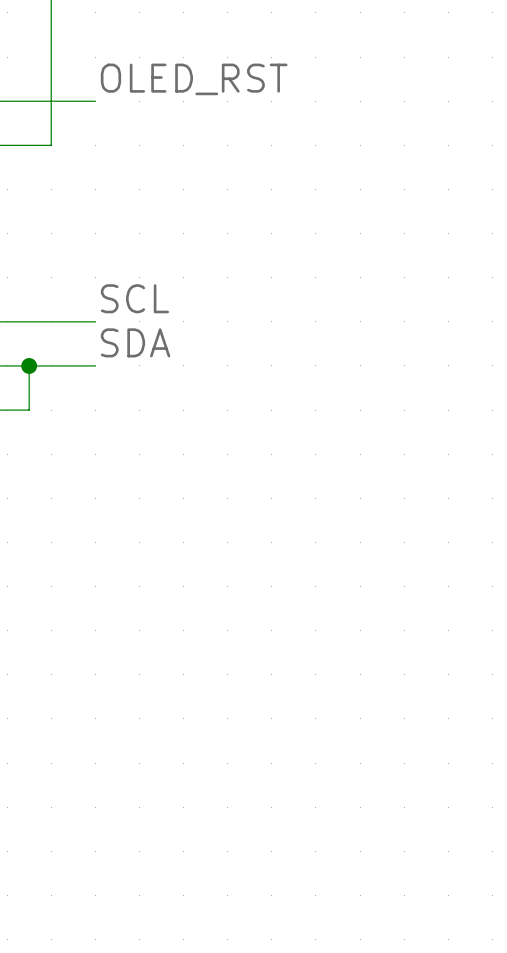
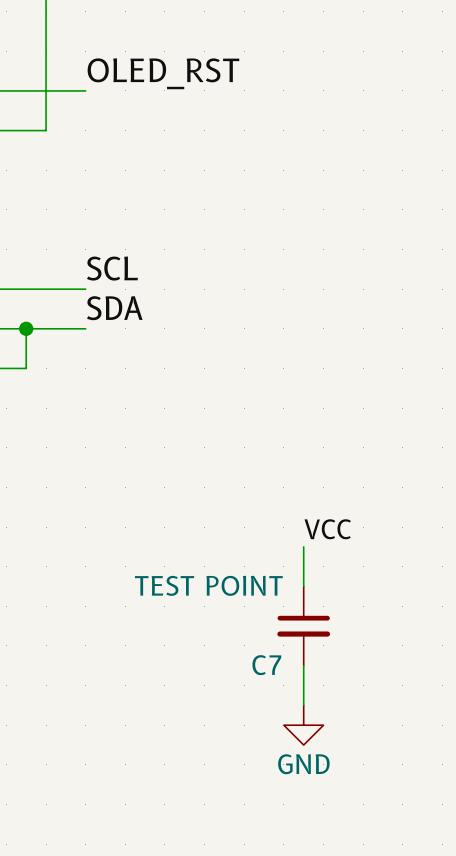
label: none -> VCC (327, 529)
wire: none -> (303, 546) (303, 586)
C7: none -> TEST POINT (303, 626)
wire: none -> (303, 665) (303, 705)
power symbol: none -> GND (303, 725)

